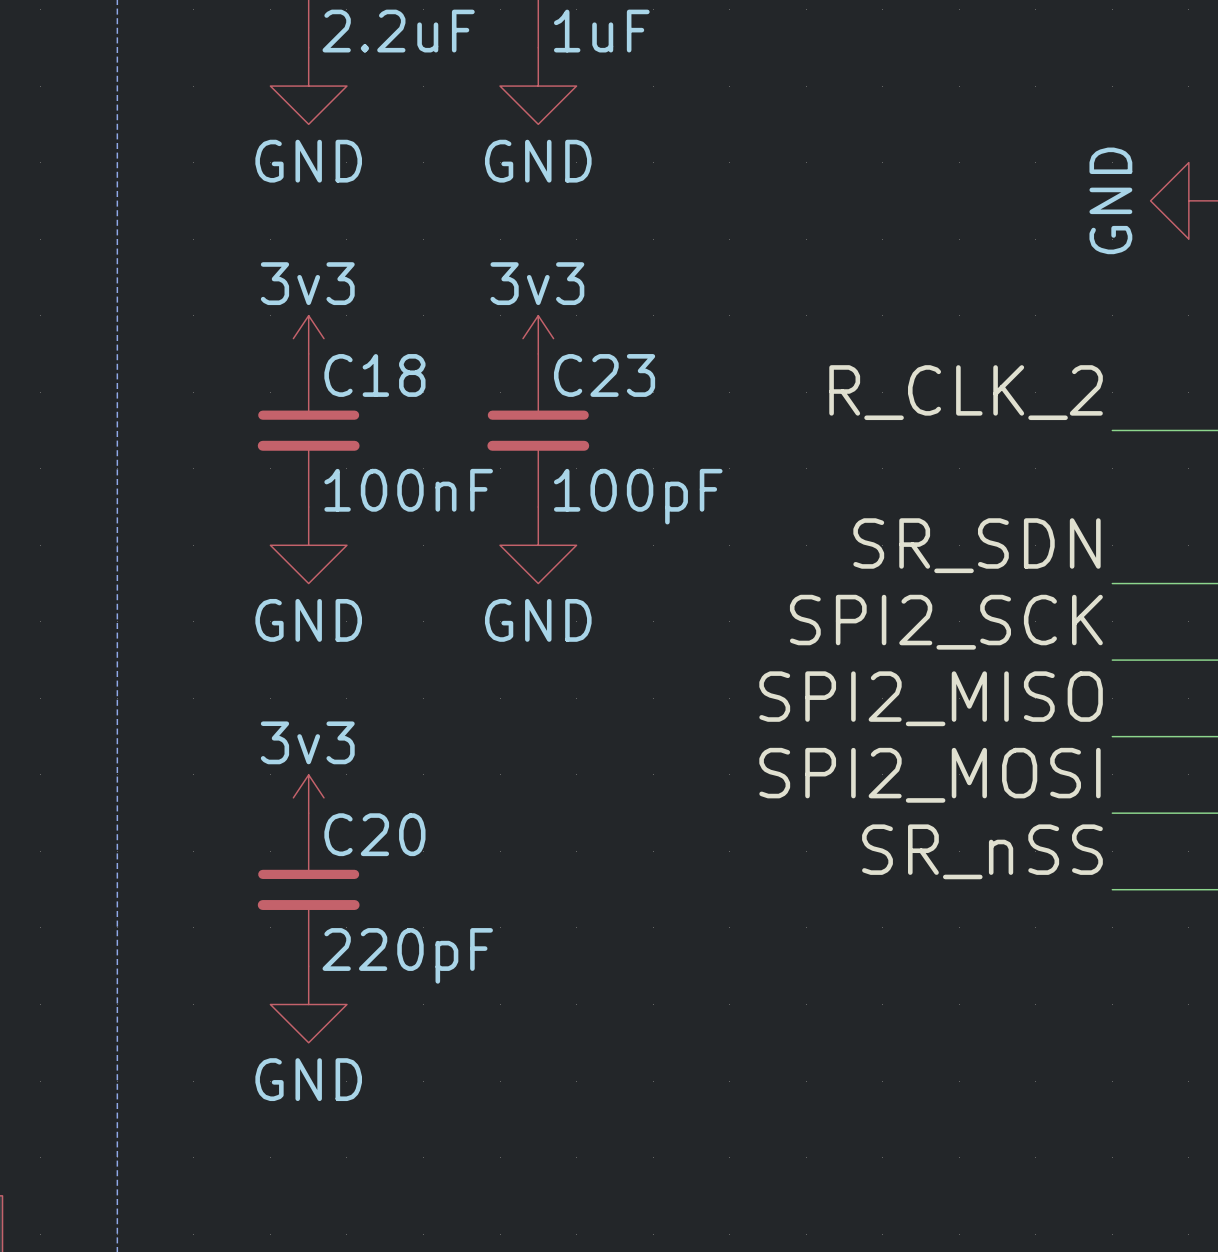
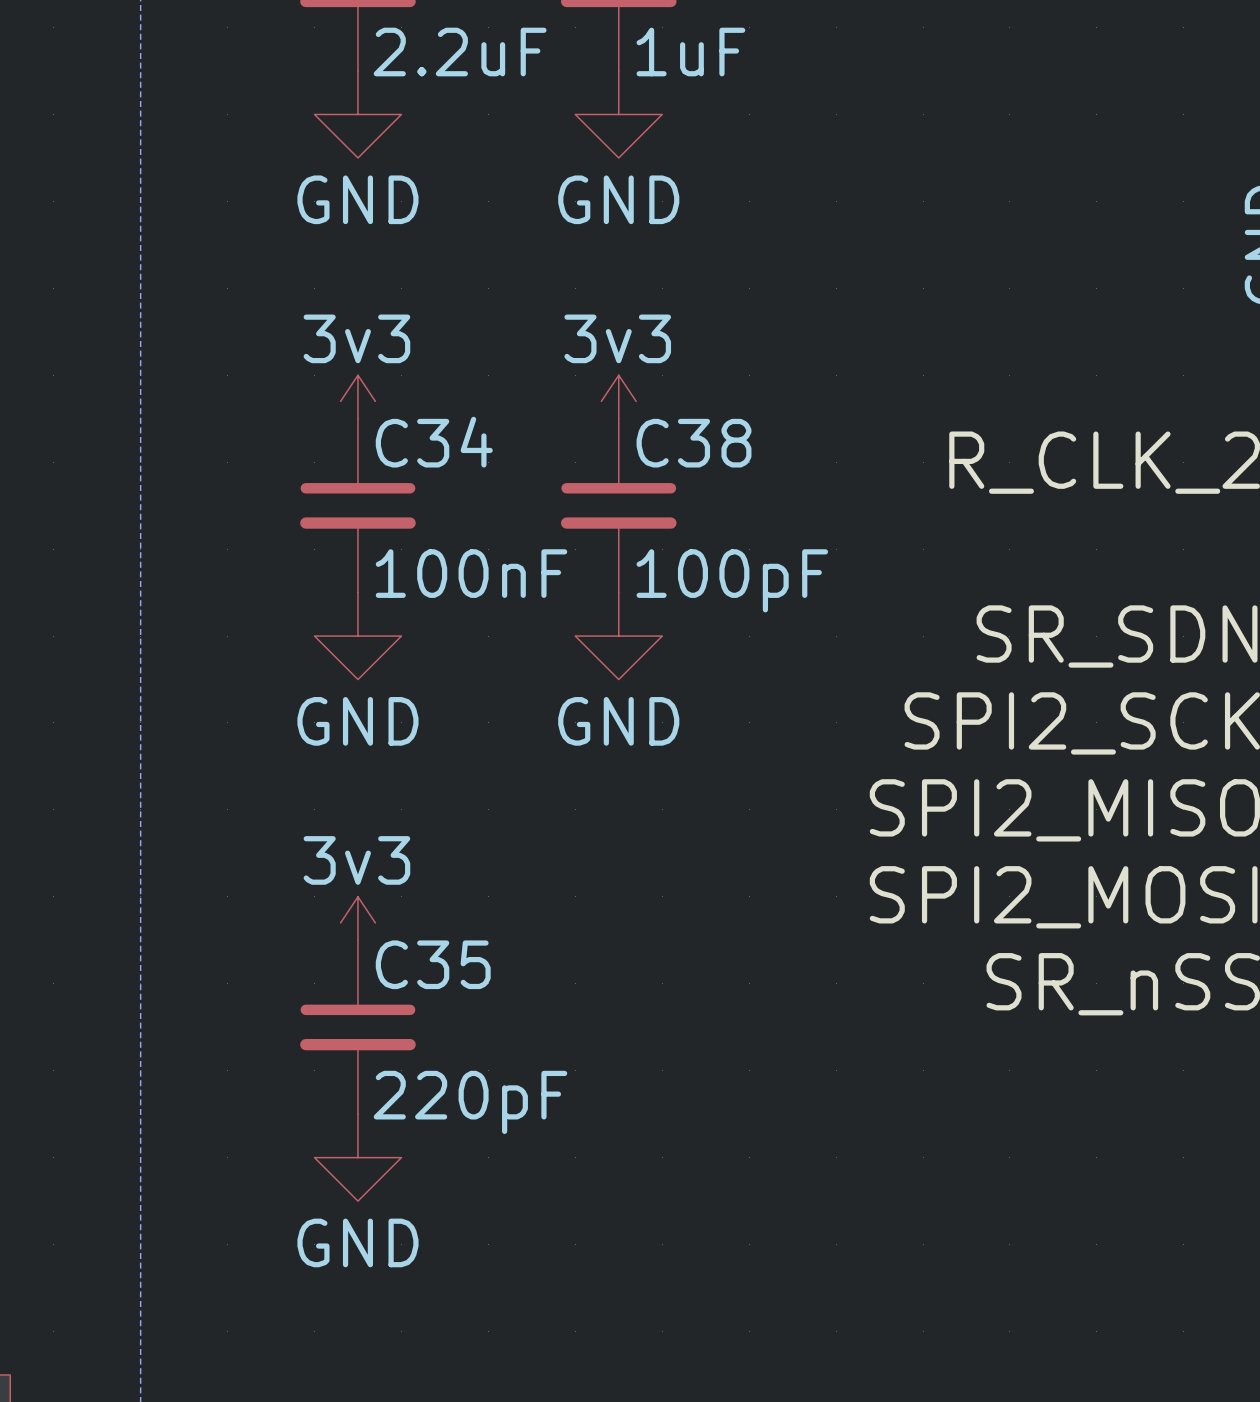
C18 name: C18 (374, 375) -> C34 (434, 442)
C23 name: C23 (604, 375) -> C38 (694, 443)
C20 name: C20 (374, 834) -> C35 (433, 964)

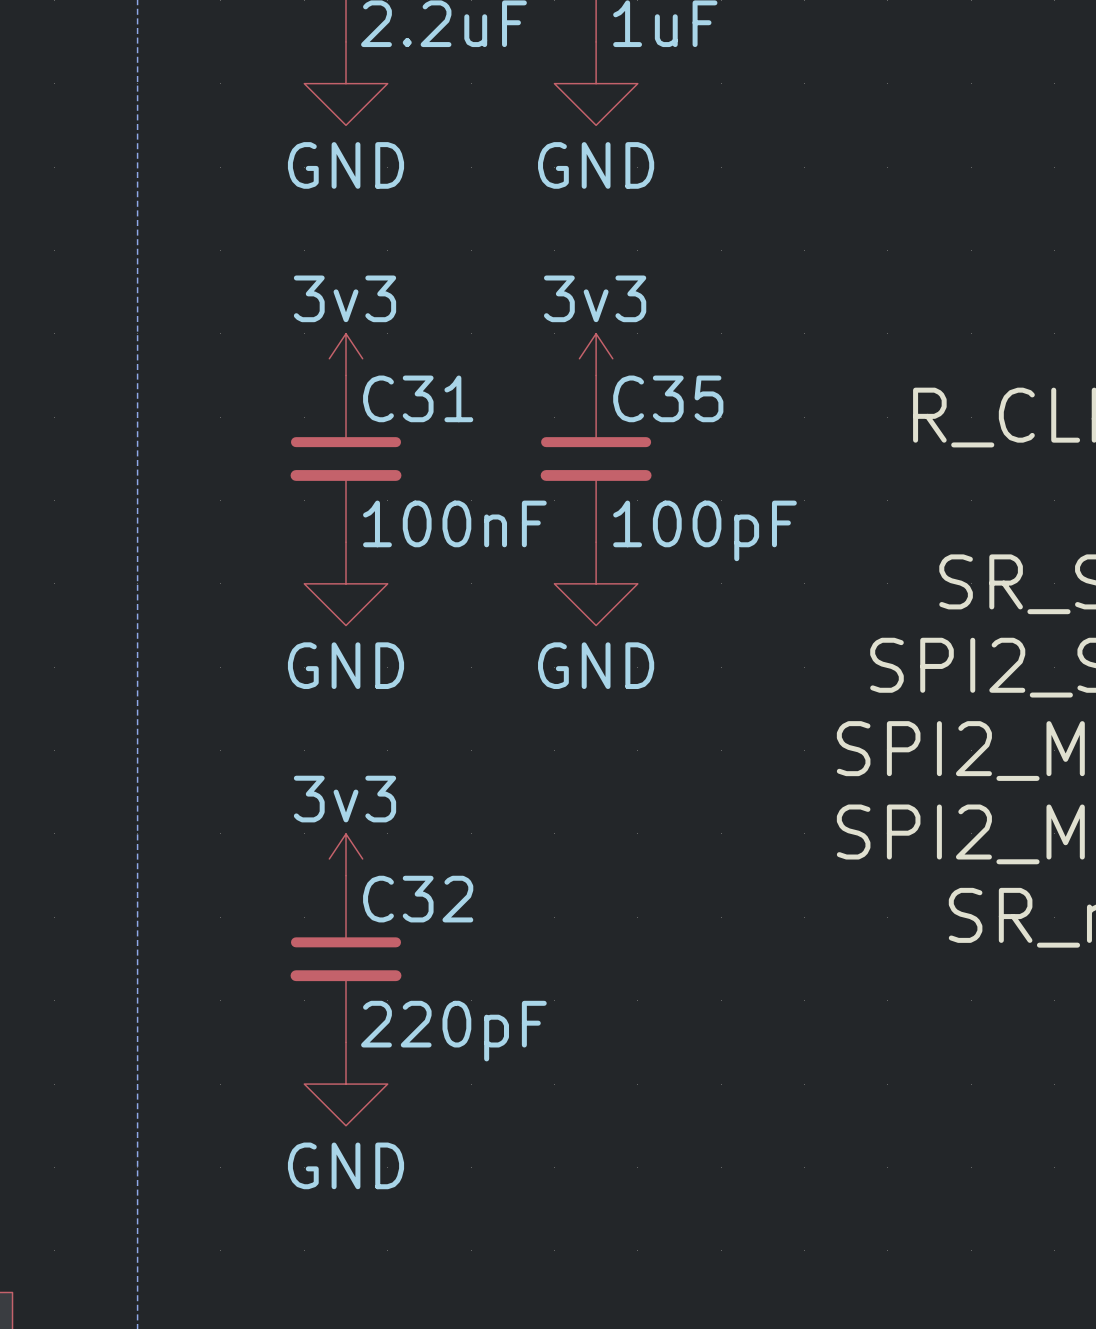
C34 name: C34 (434, 442) -> C31 (418, 398)
C38 name: C38 (694, 443) -> C35 (668, 398)
C35 name: C35 (433, 964) -> C32 (418, 899)

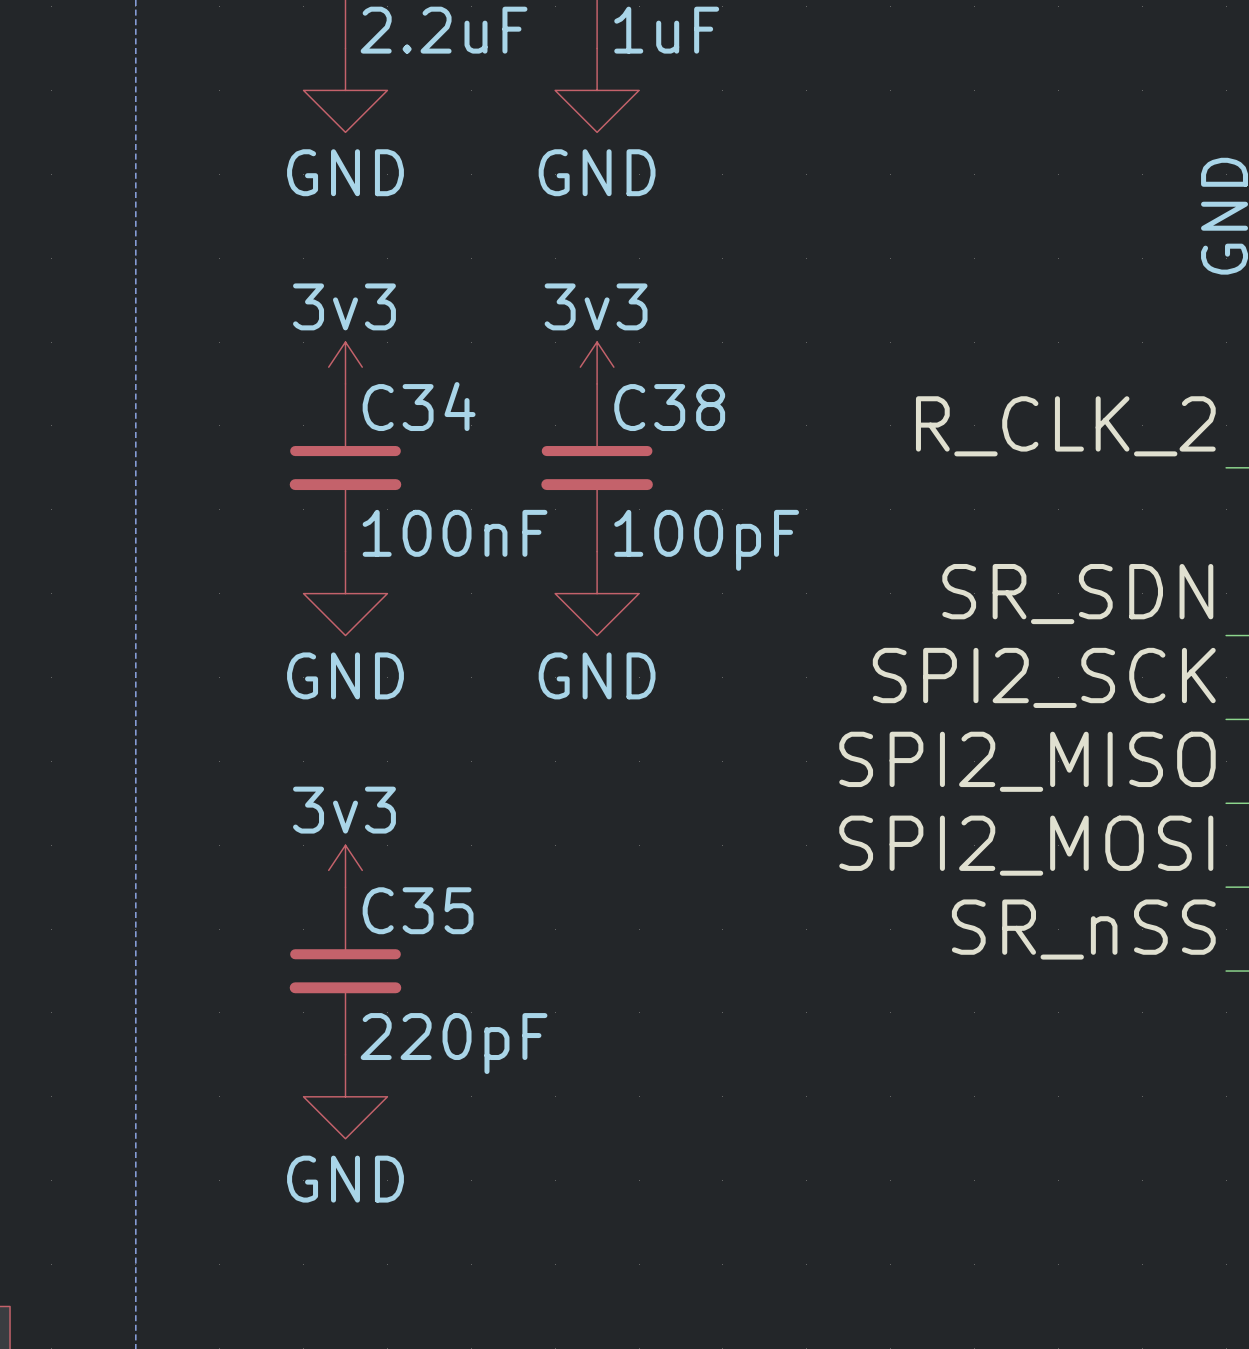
C31 name: C31 (418, 398) -> C34 (419, 406)
C35 name: C35 (668, 398) -> C38 (669, 407)
C32 name: C32 (418, 899) -> C35 (418, 910)

